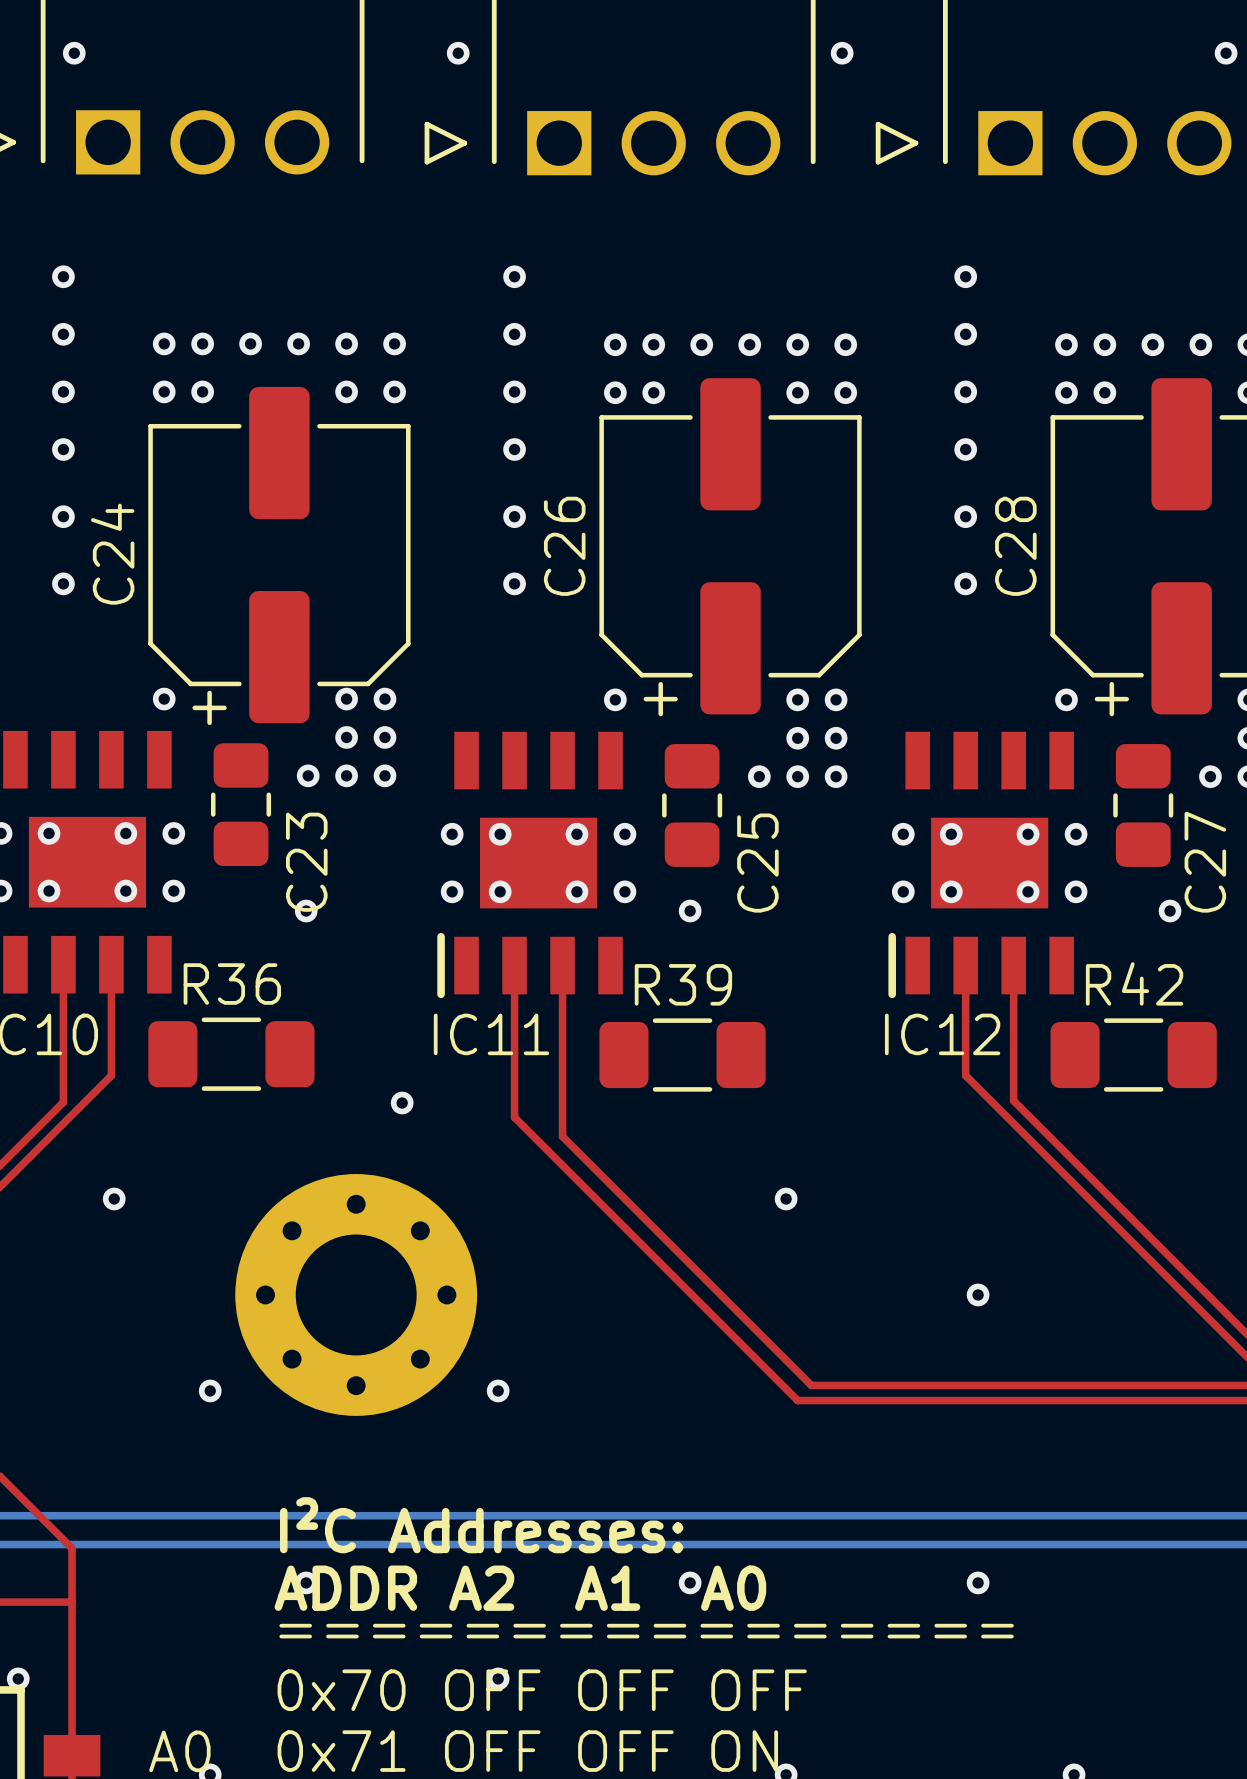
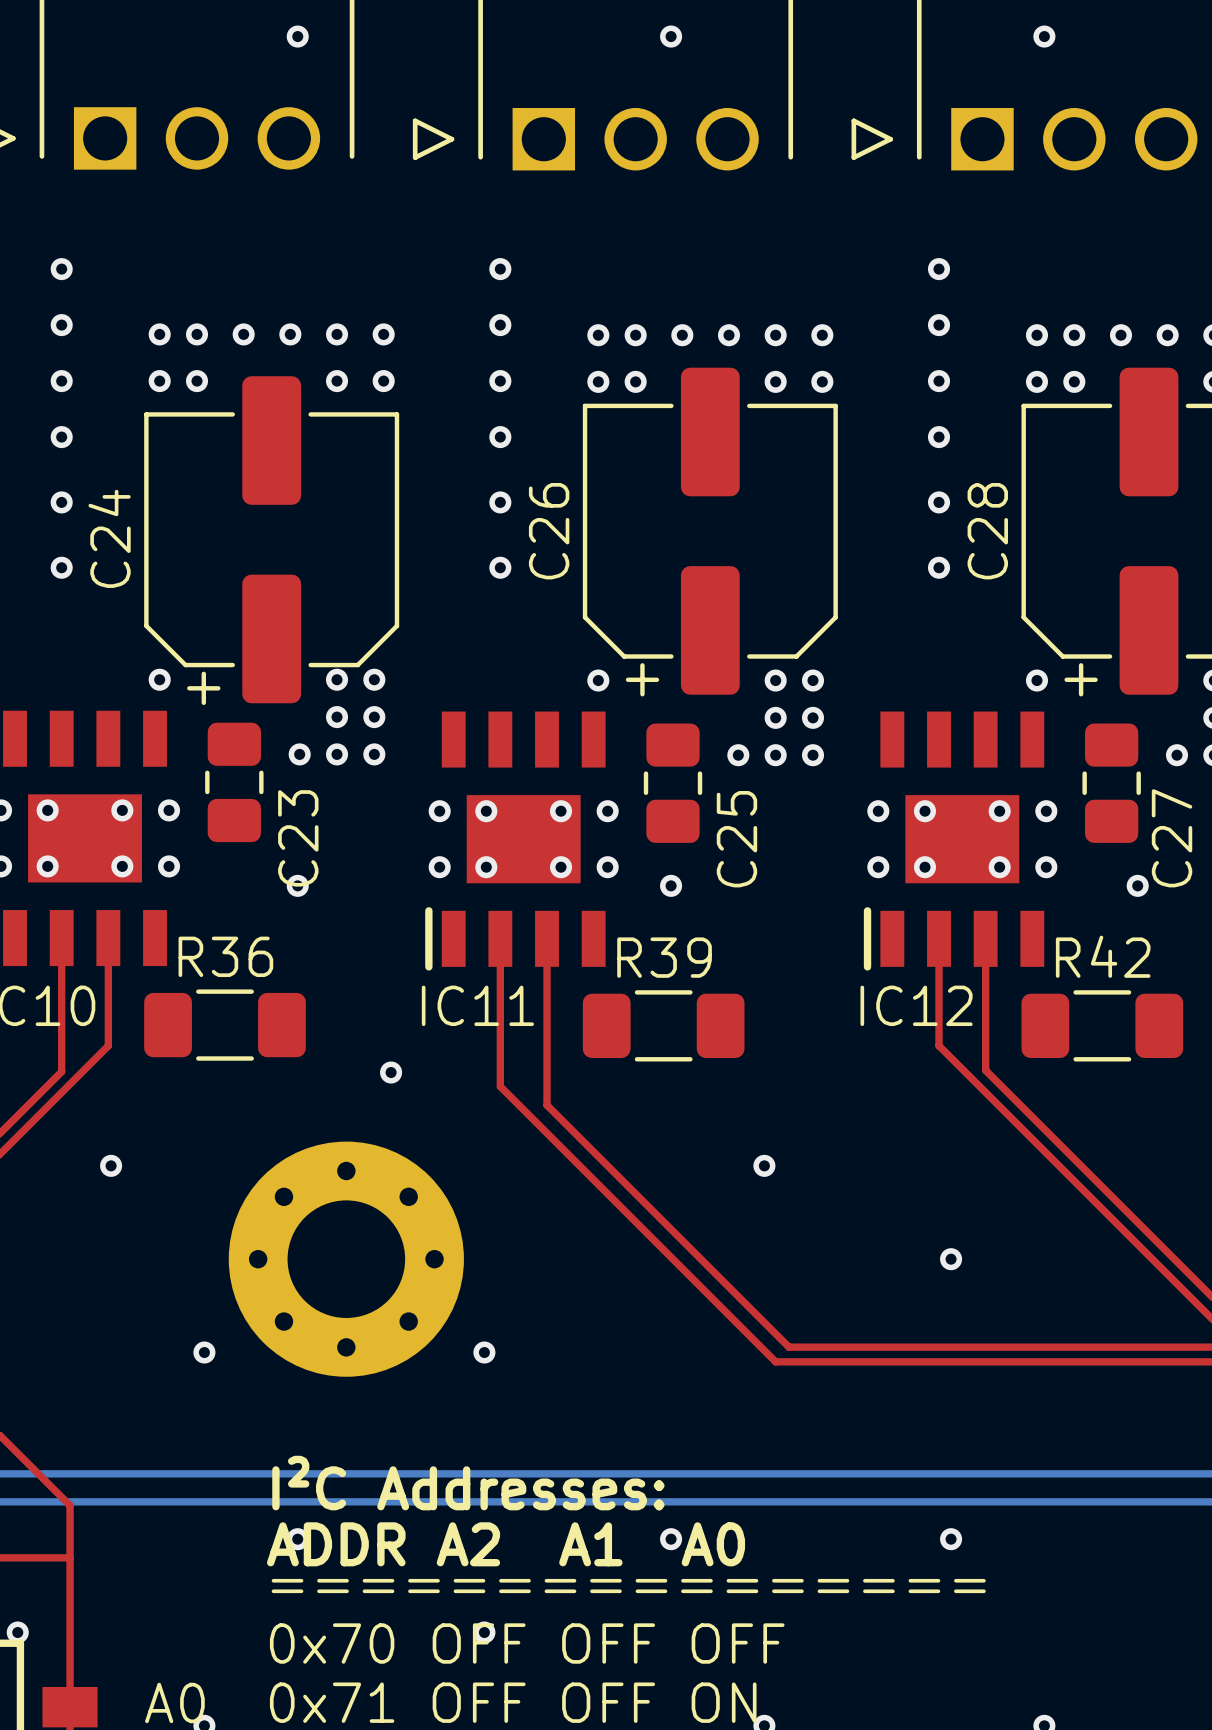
via: none -> (297, 36)
via: none -> (671, 36)
via: none -> (1044, 36)
via: (74, 53) -> none
via: (458, 53) -> none
via: (842, 53) -> none
via: (1226, 53) -> none

